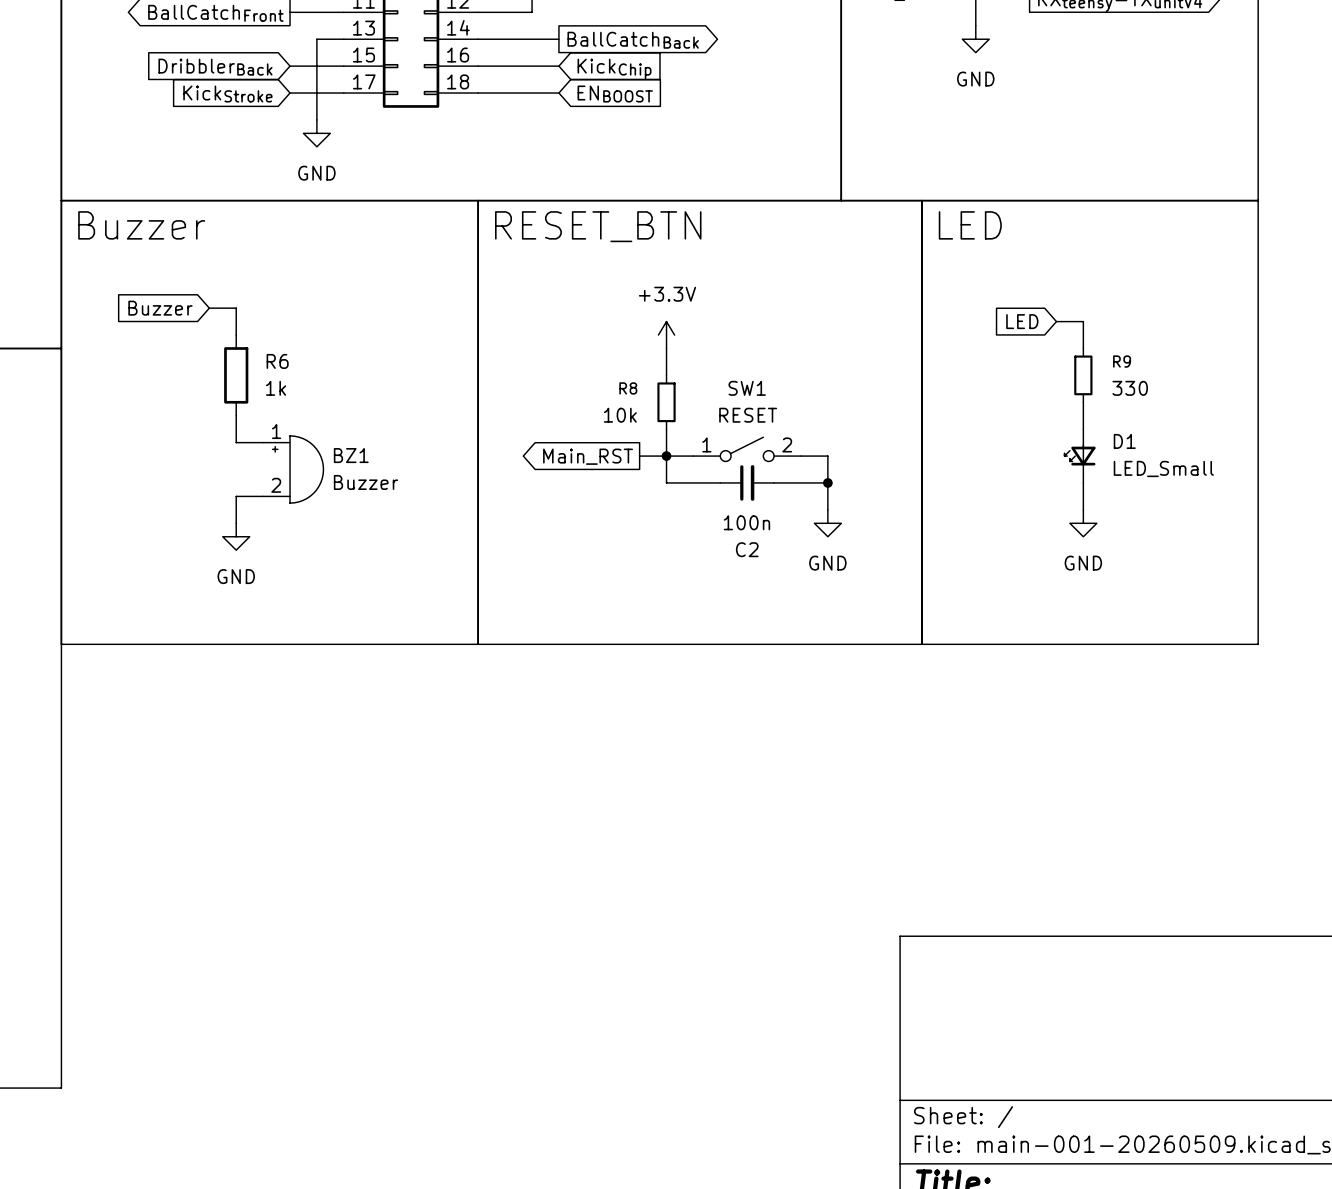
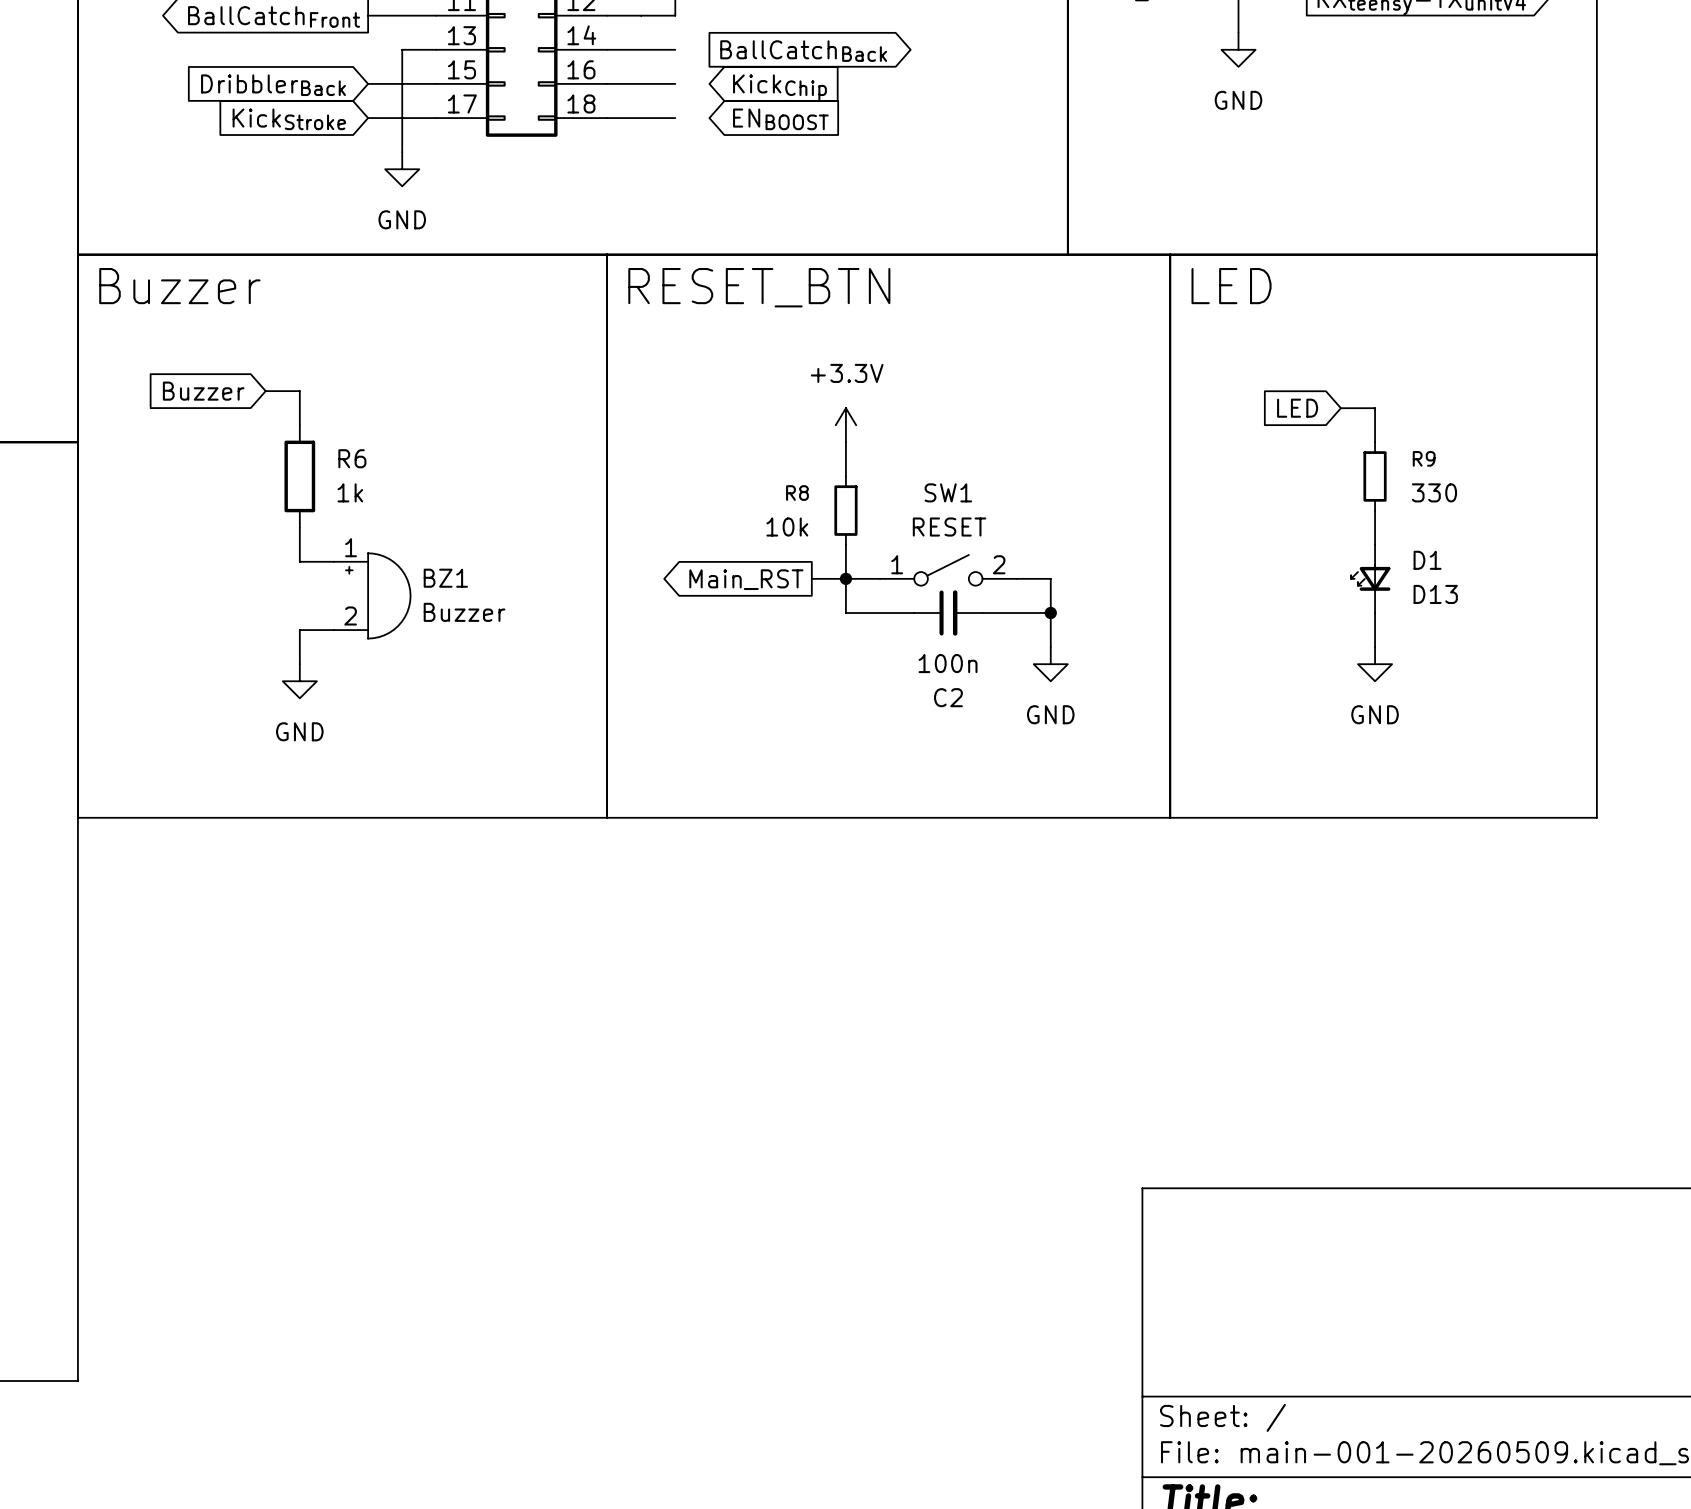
wire: (532, 39) (558, 39) -> none
wire: (532, 66) (558, 66) -> none
wire: (532, 93) (558, 93) -> none
D1 value: LED_Small (1163, 468) -> D13 (1435, 594)

